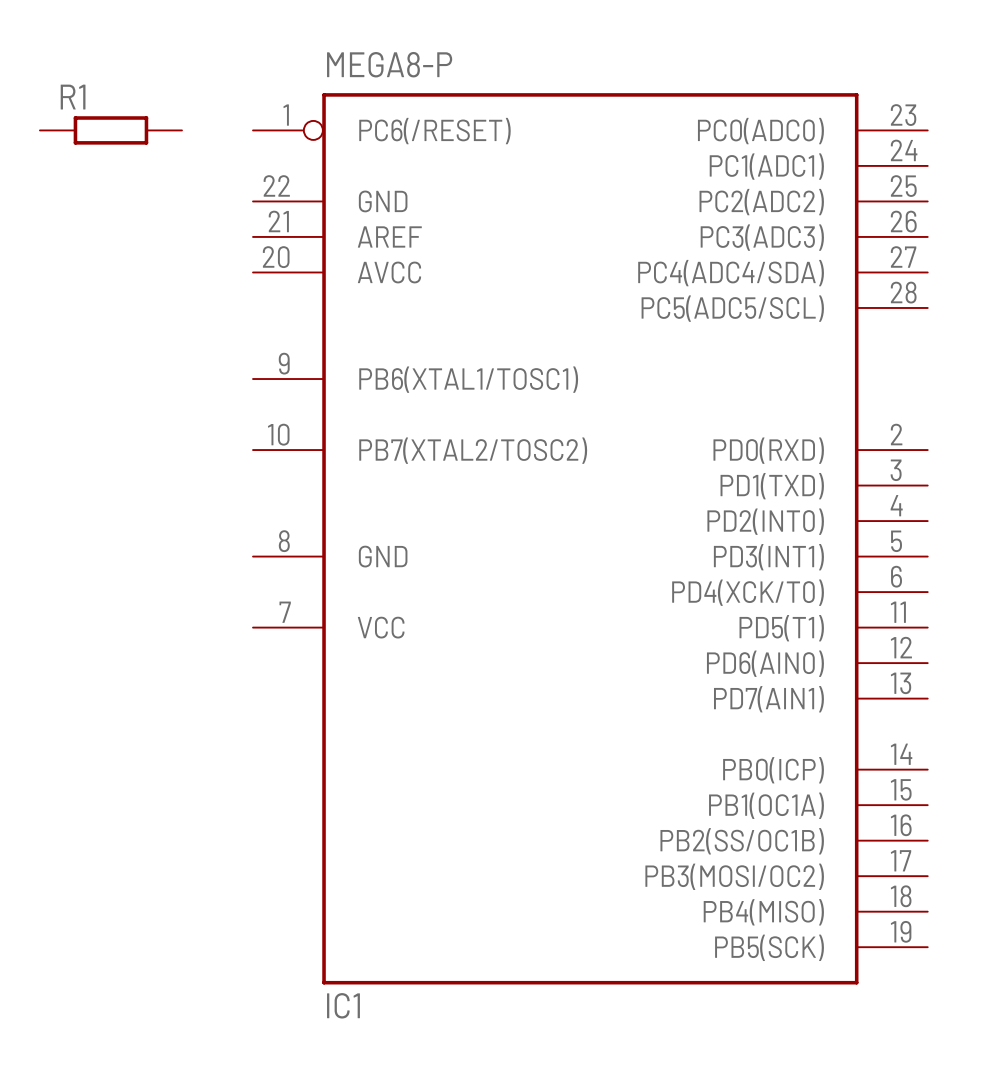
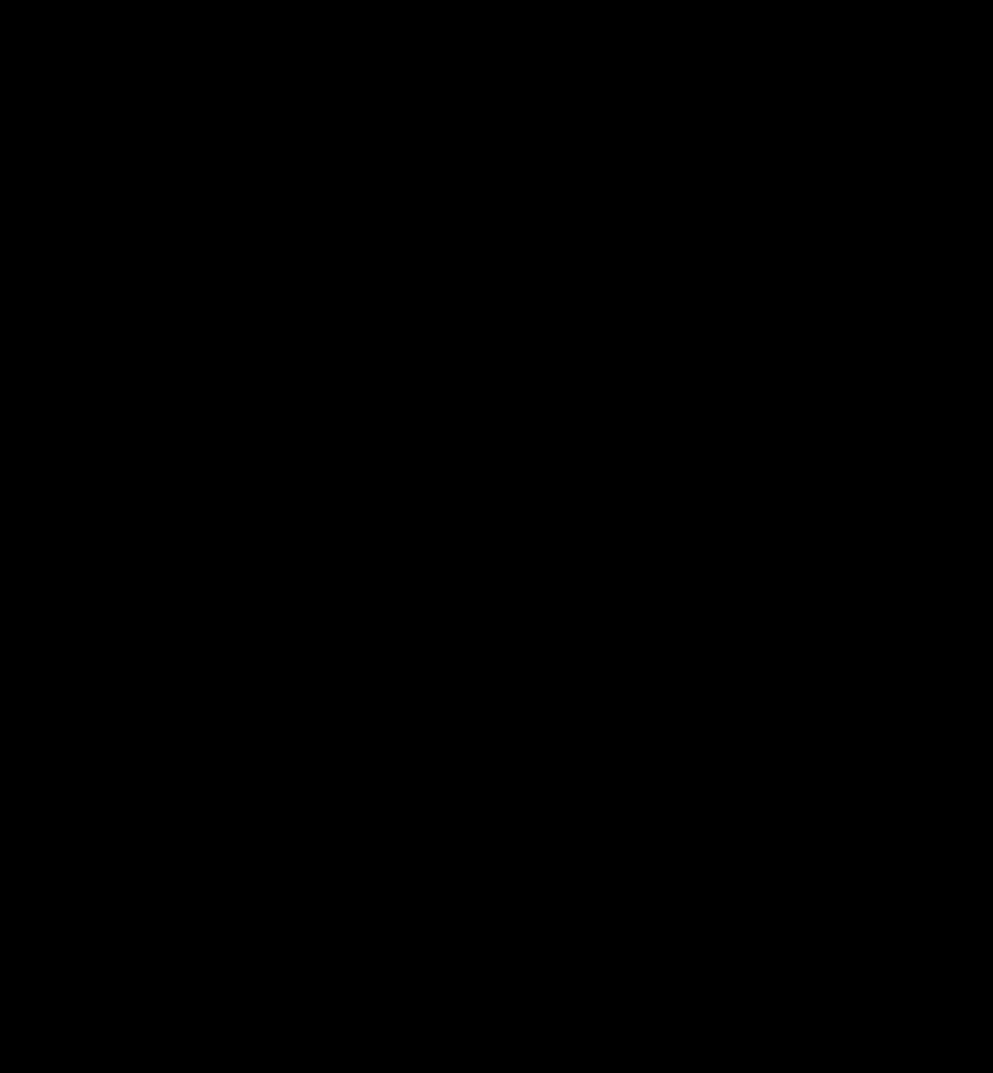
R1: (110, 130) -> none
IC1: MEGA8-P (590, 538) -> none

